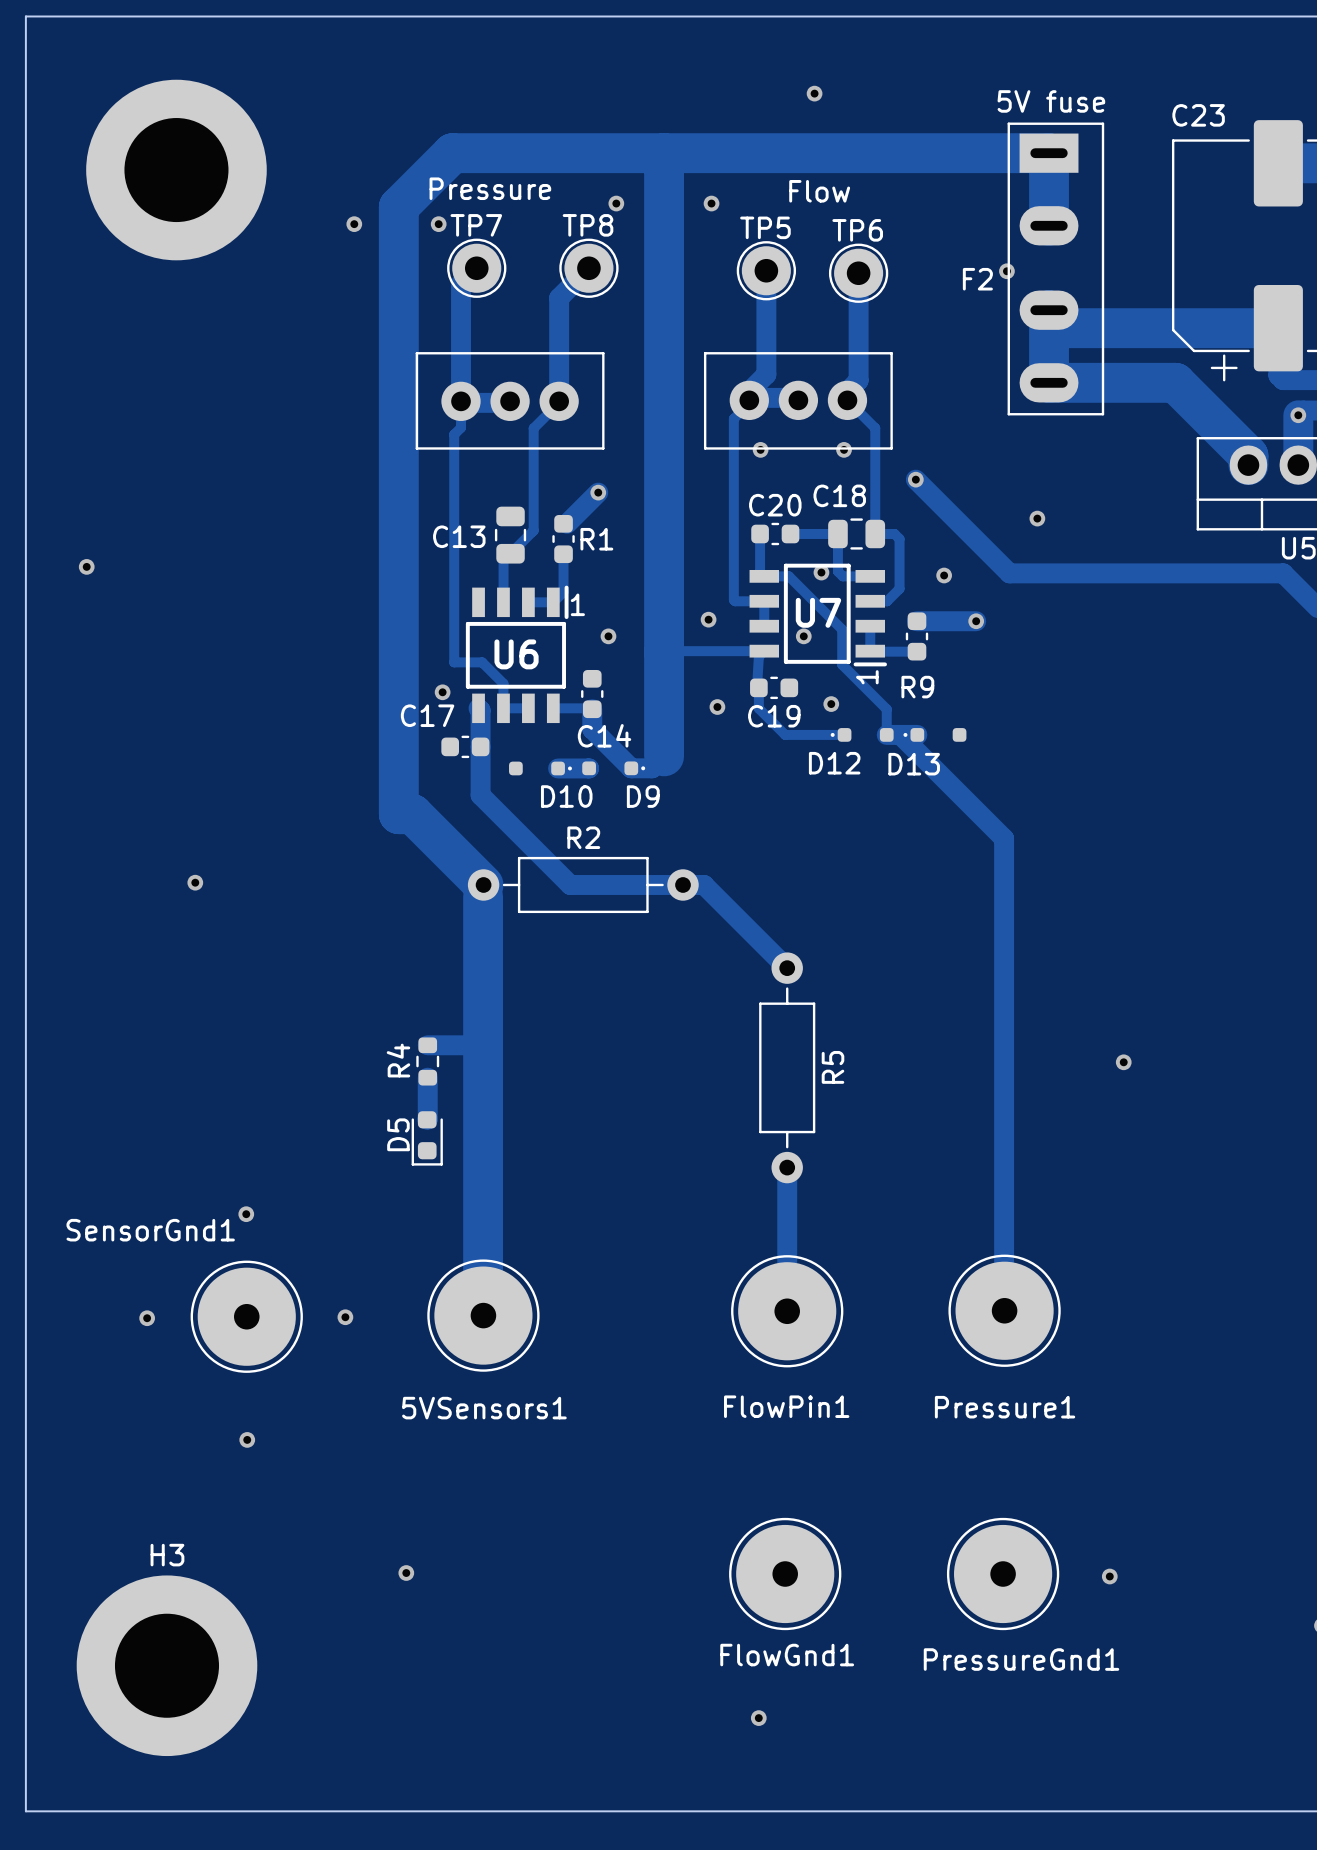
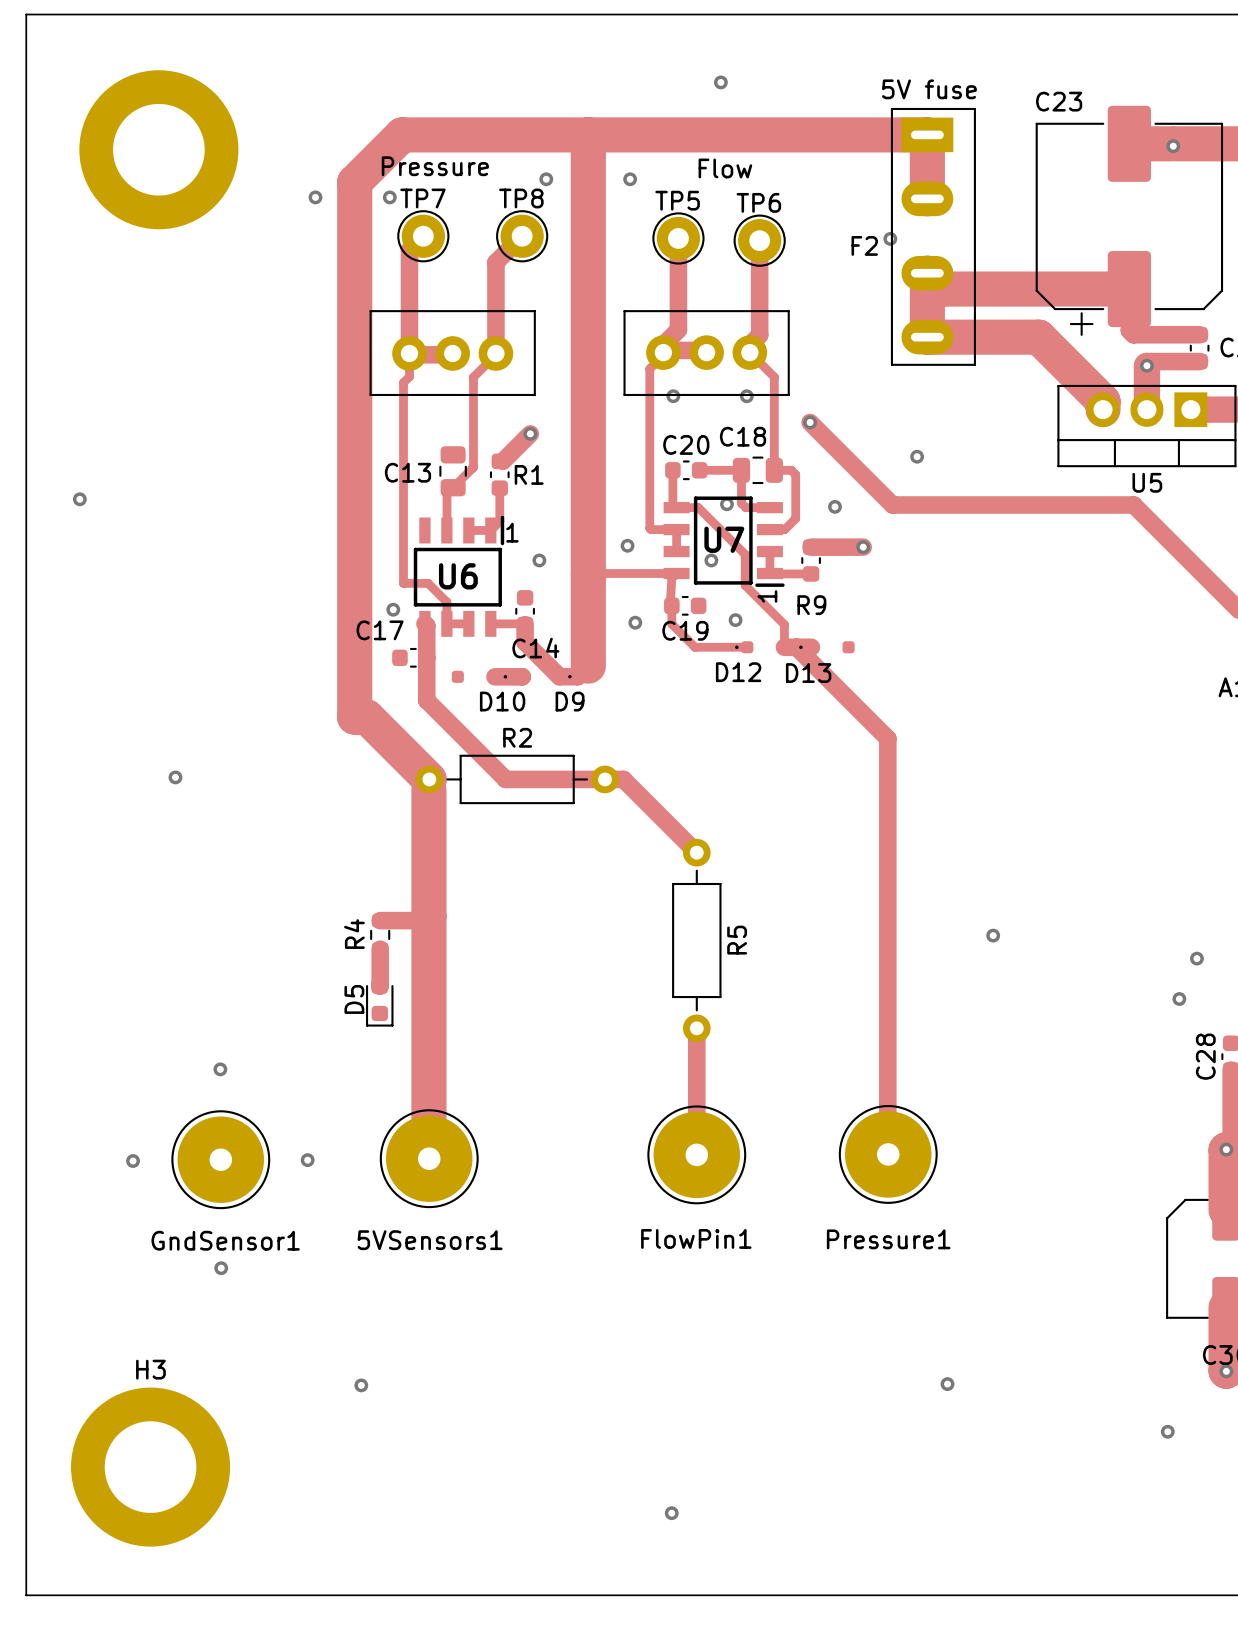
SensorGnd1 name: SensorGnd1 (150, 1230) -> GndSensor1 (225, 1240)
FlowGnd1: (785, 1574) -> none
PressureGnd1: (1003, 1574) -> none
via position: (1109, 1576) -> (947, 1384)

